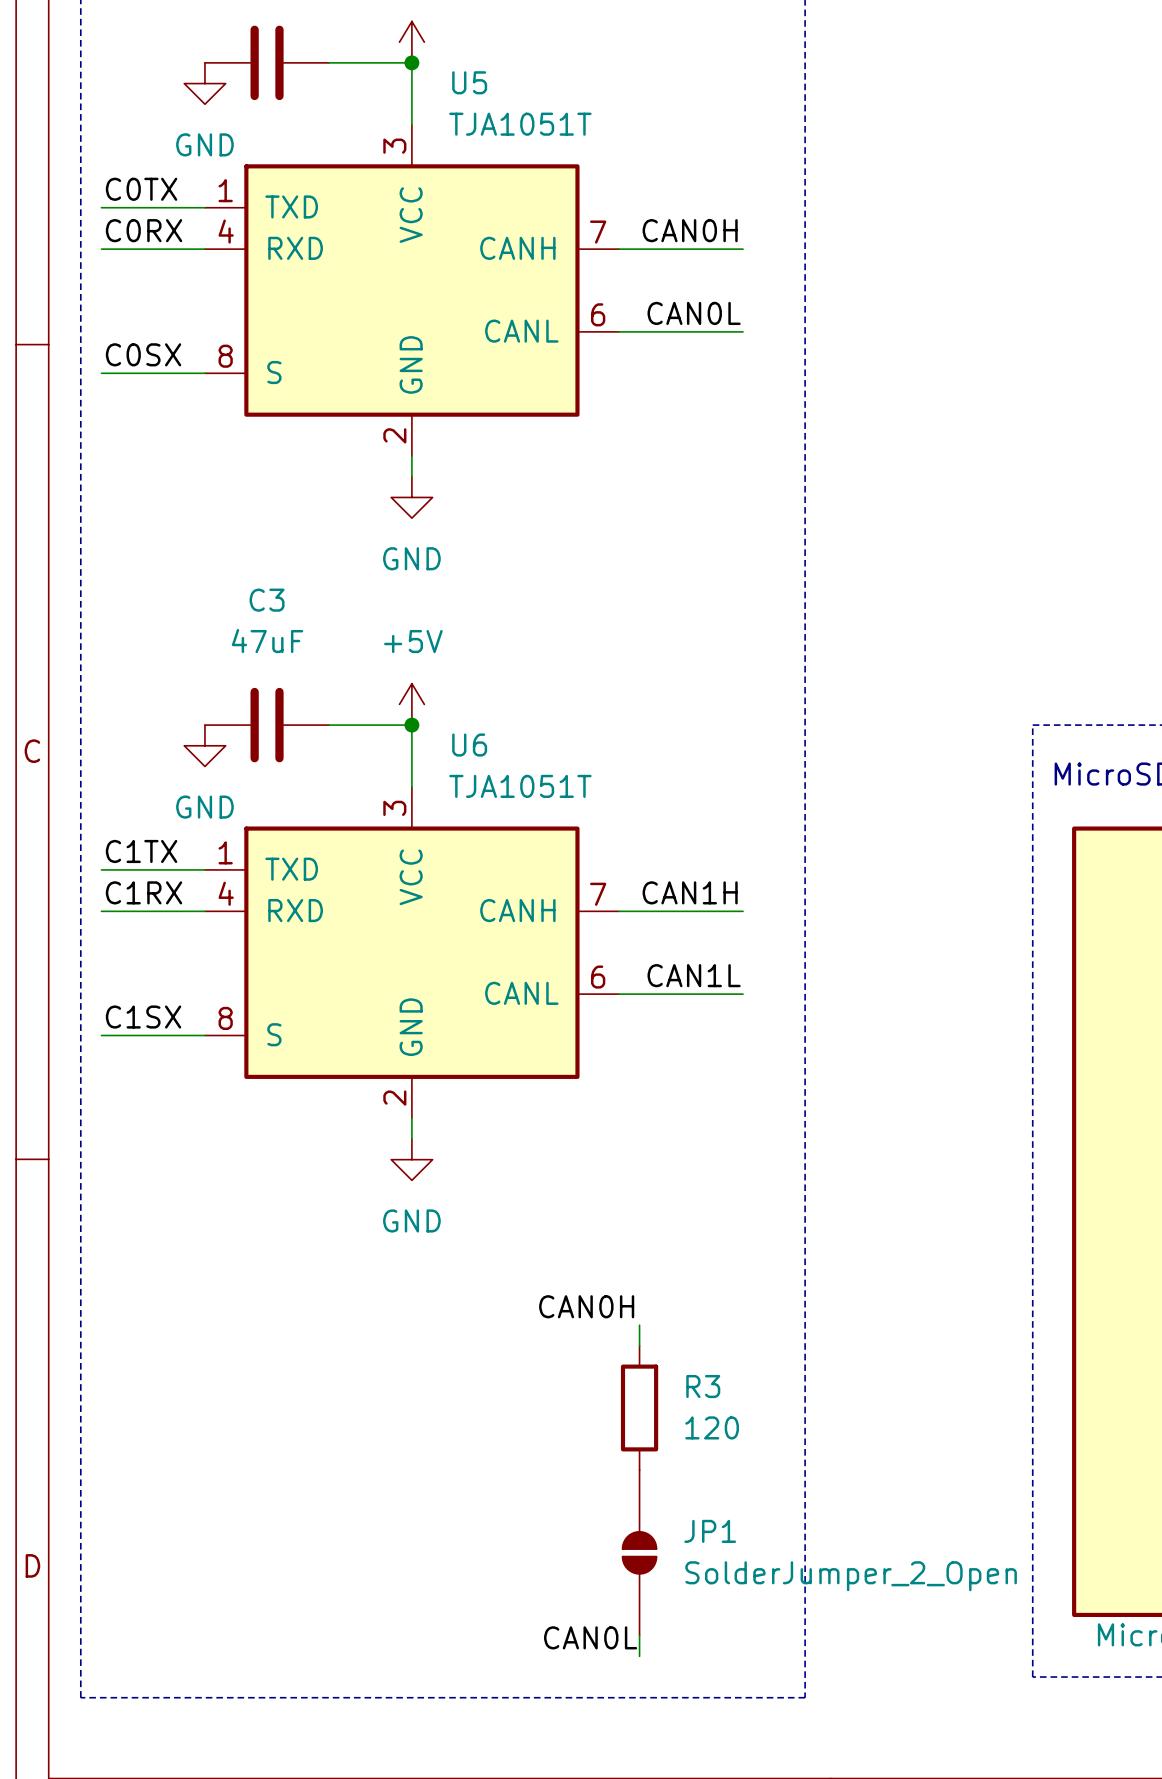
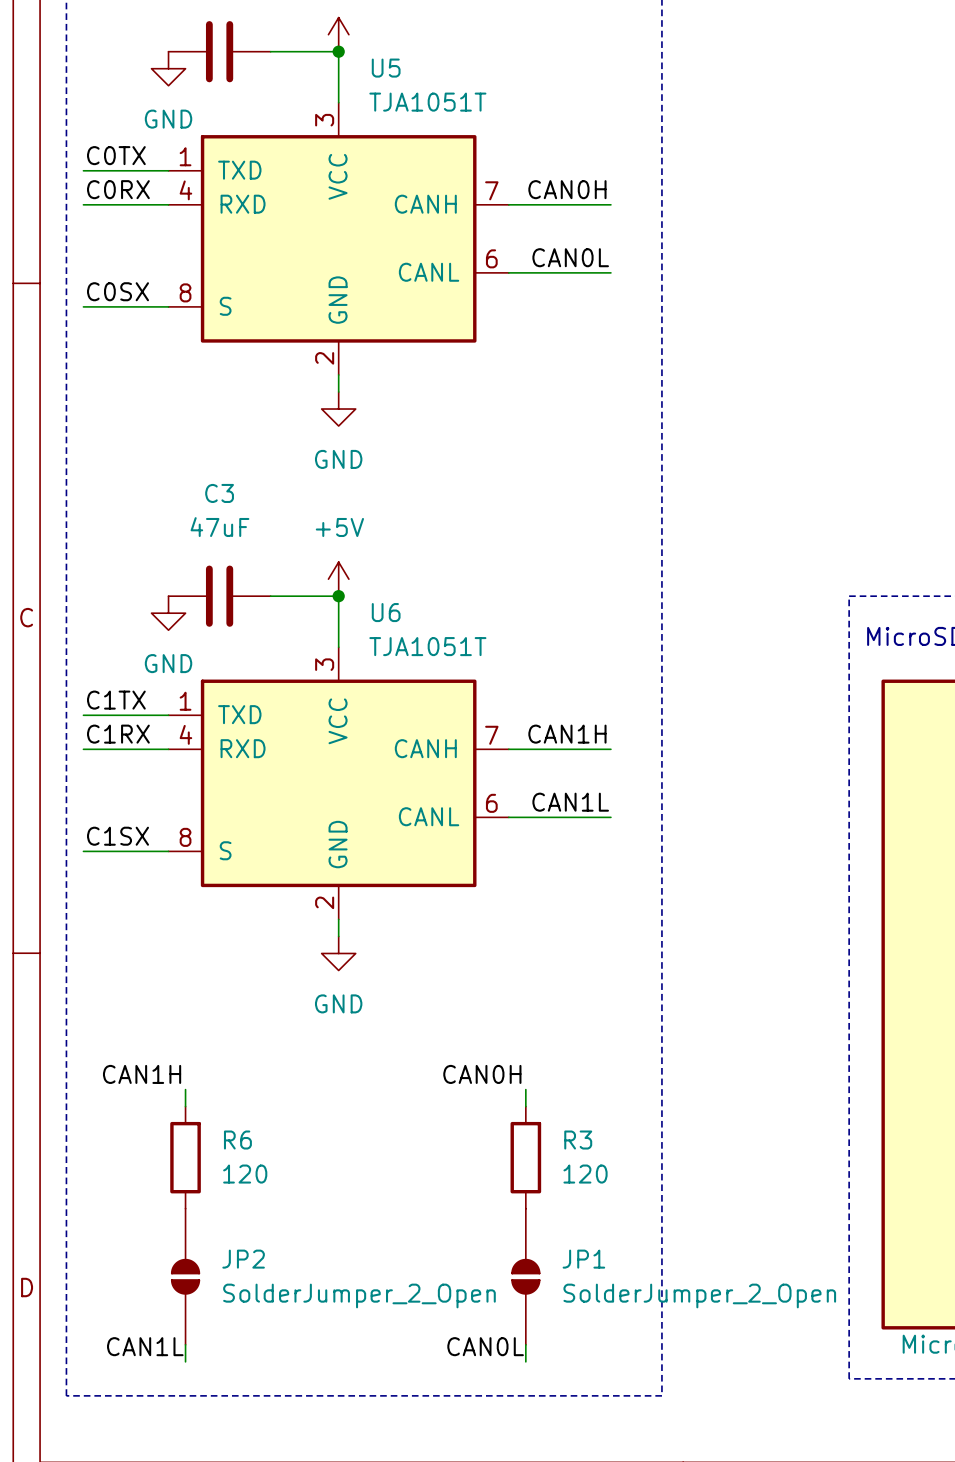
label: none -> CAN1H (142, 1074)
wire: none -> (185, 1089) (185, 1106)
R6: none -> 120 (185, 1157)
JP2: none -> SolderJumper_2_Open (185, 1276)
wire: none -> (185, 1344) (185, 1361)
label: none -> CAN1L (145, 1346)

